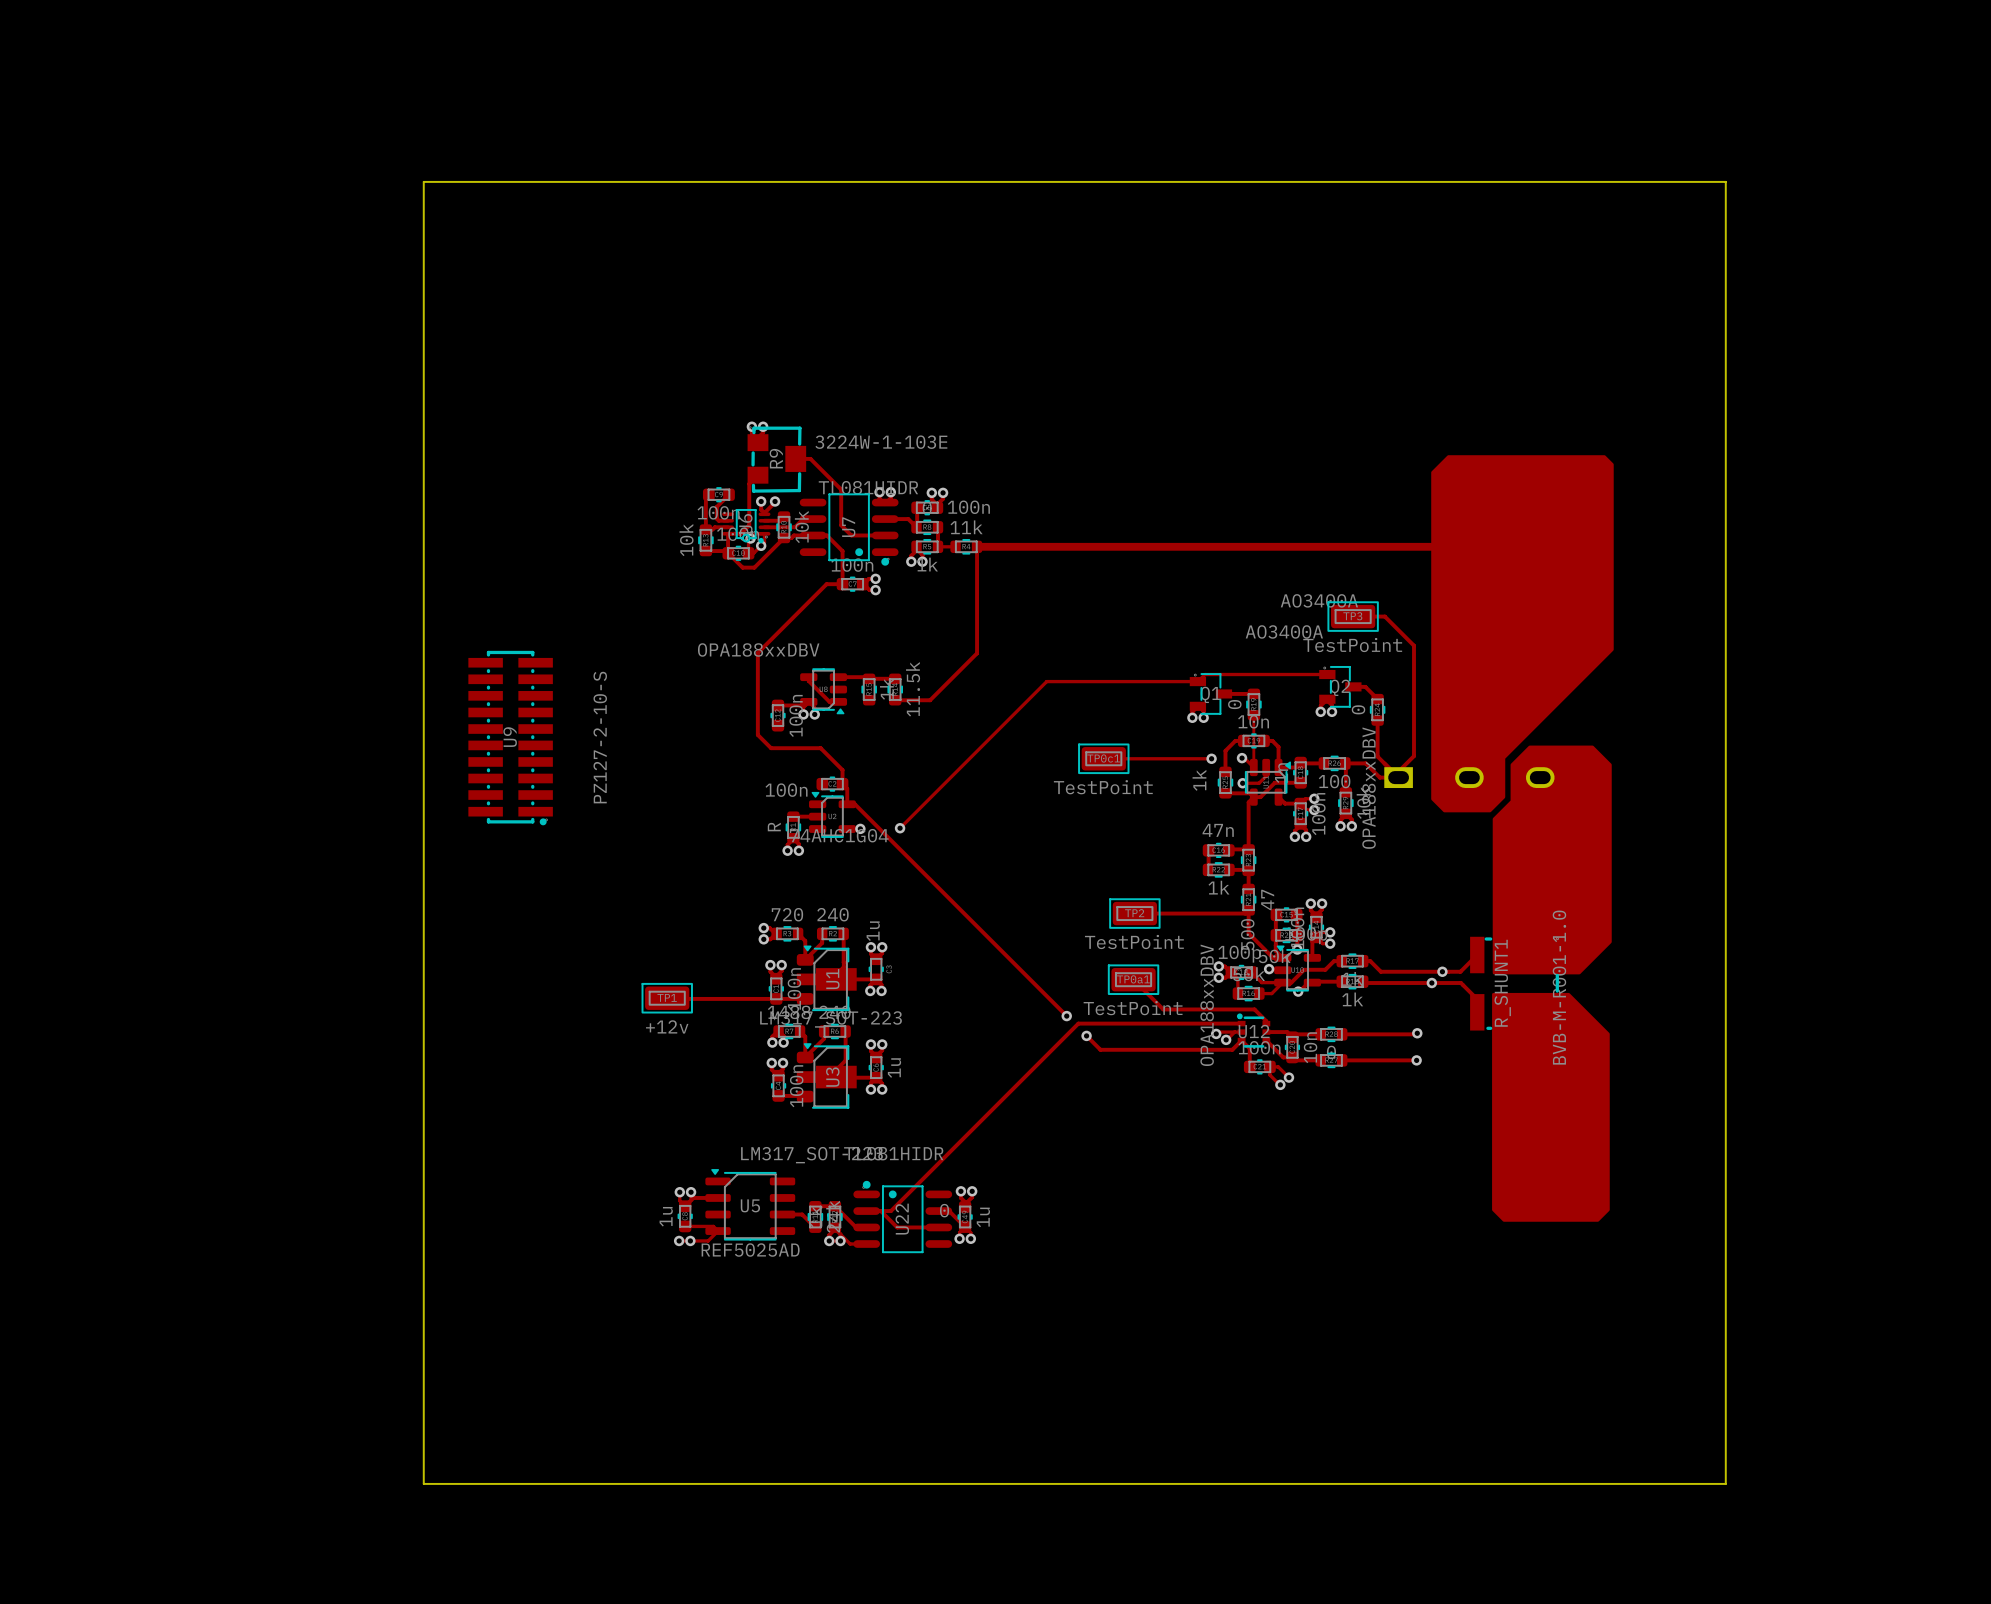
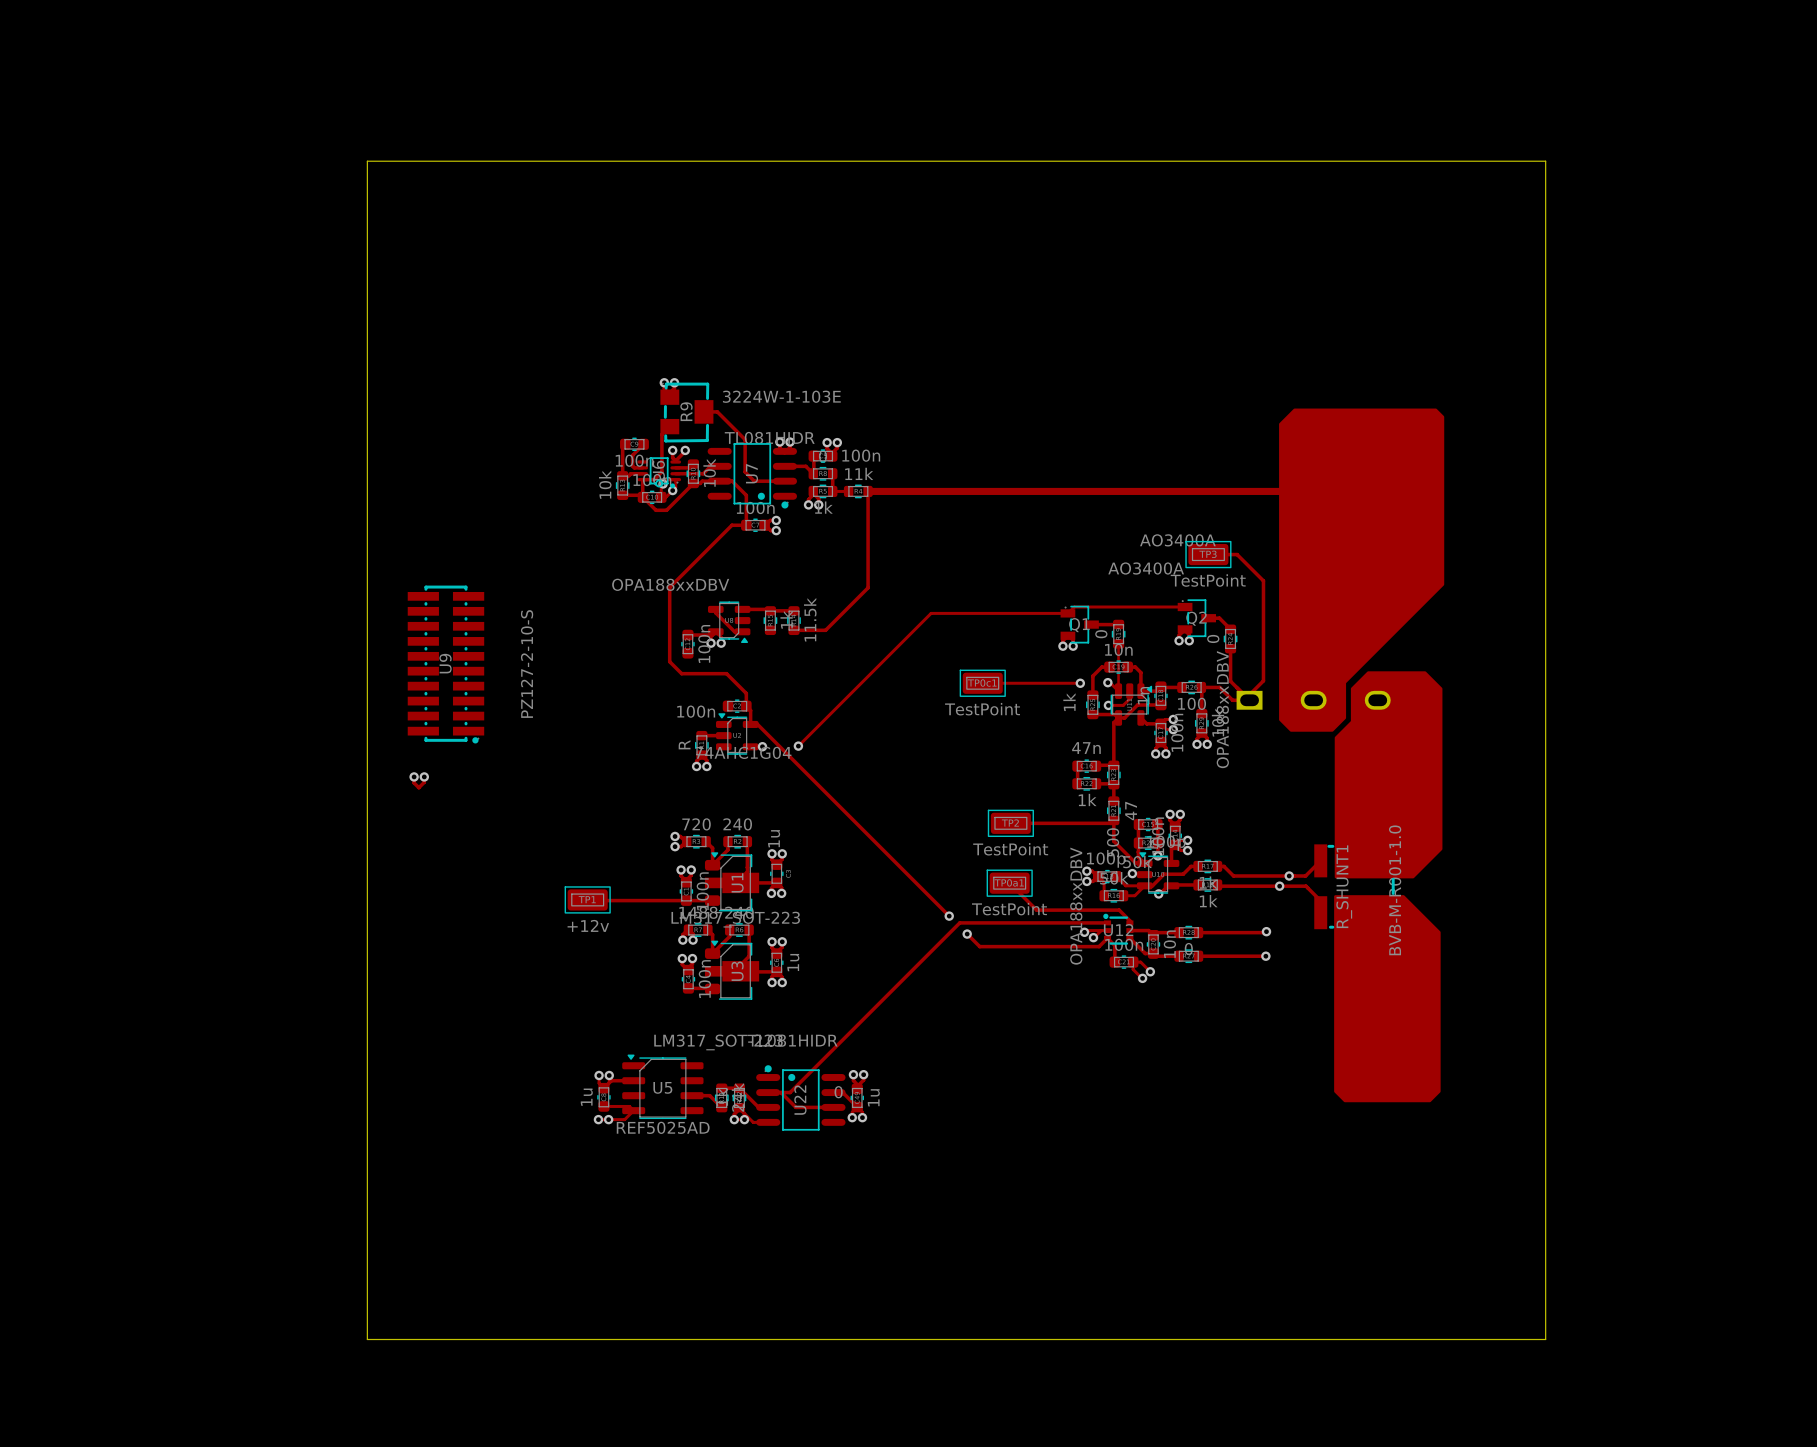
track: none -> (414, 776) (414, 782) (418, 787) (424, 782) (424, 776)
via: none -> (414, 776)
via: none -> (424, 776)

